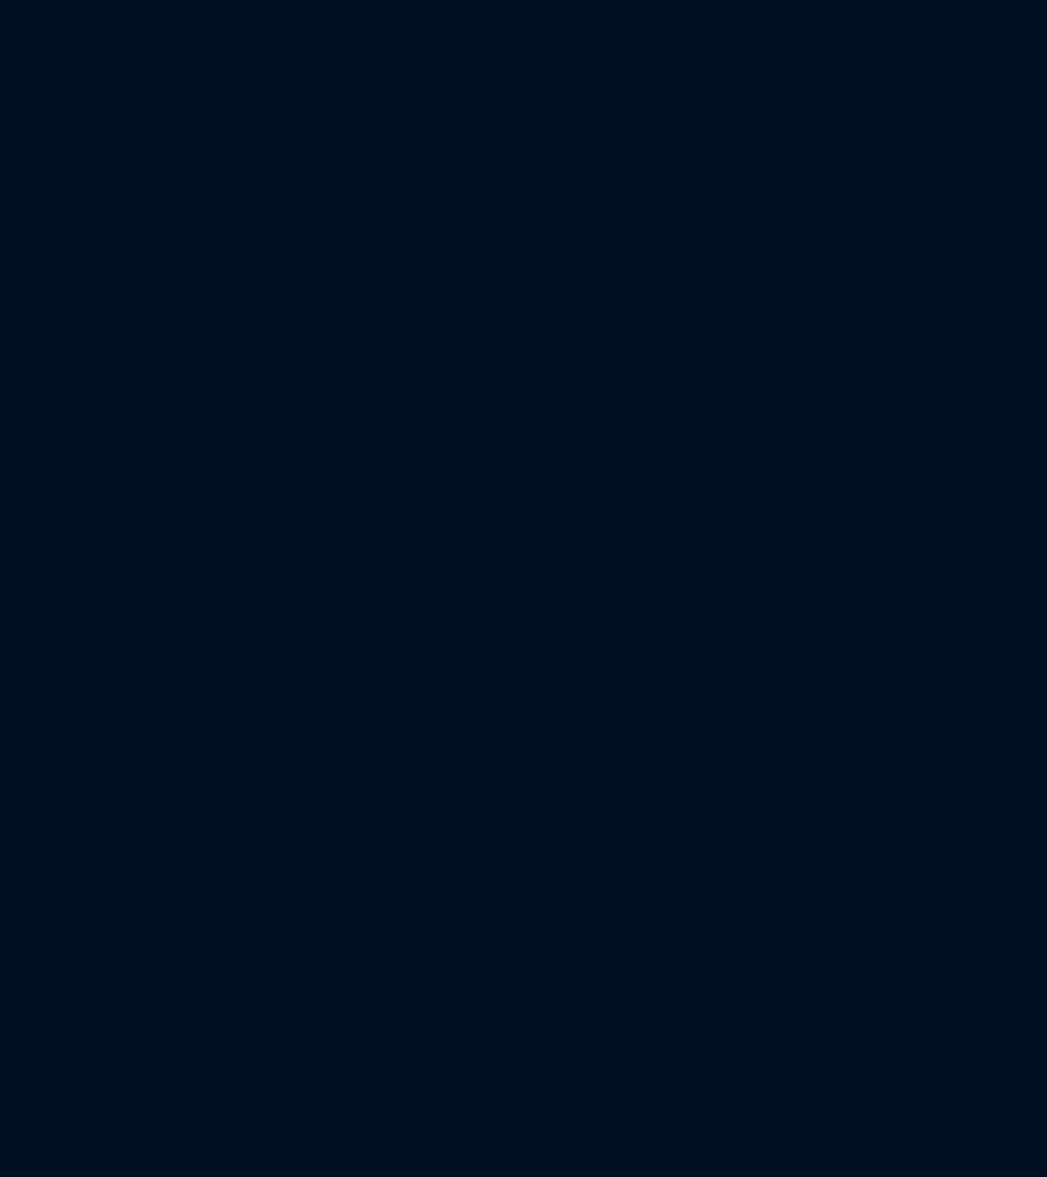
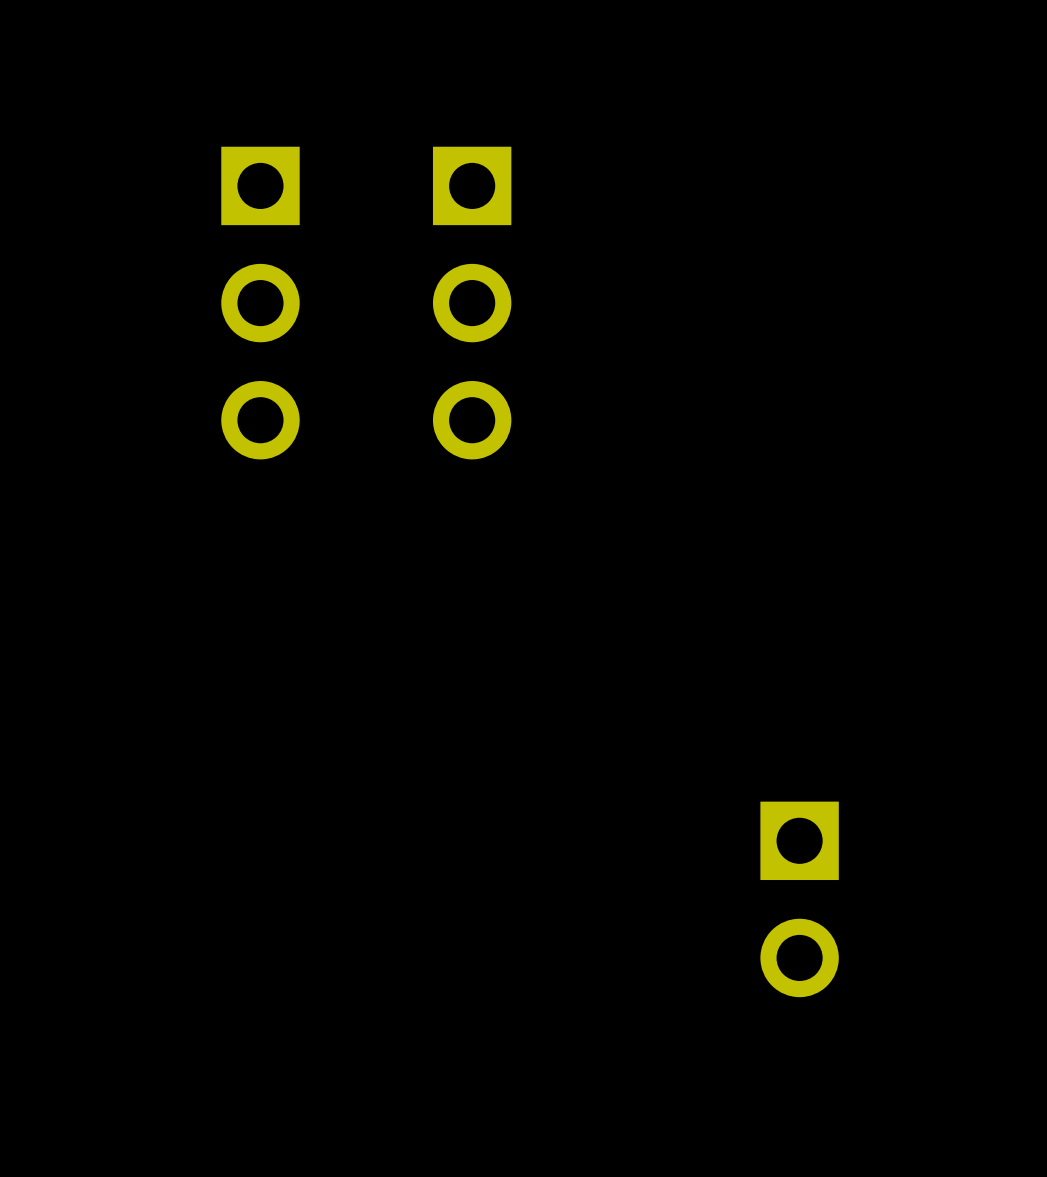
part: none -> (260, 303)
part: none -> (472, 303)
part: none -> (799, 899)

